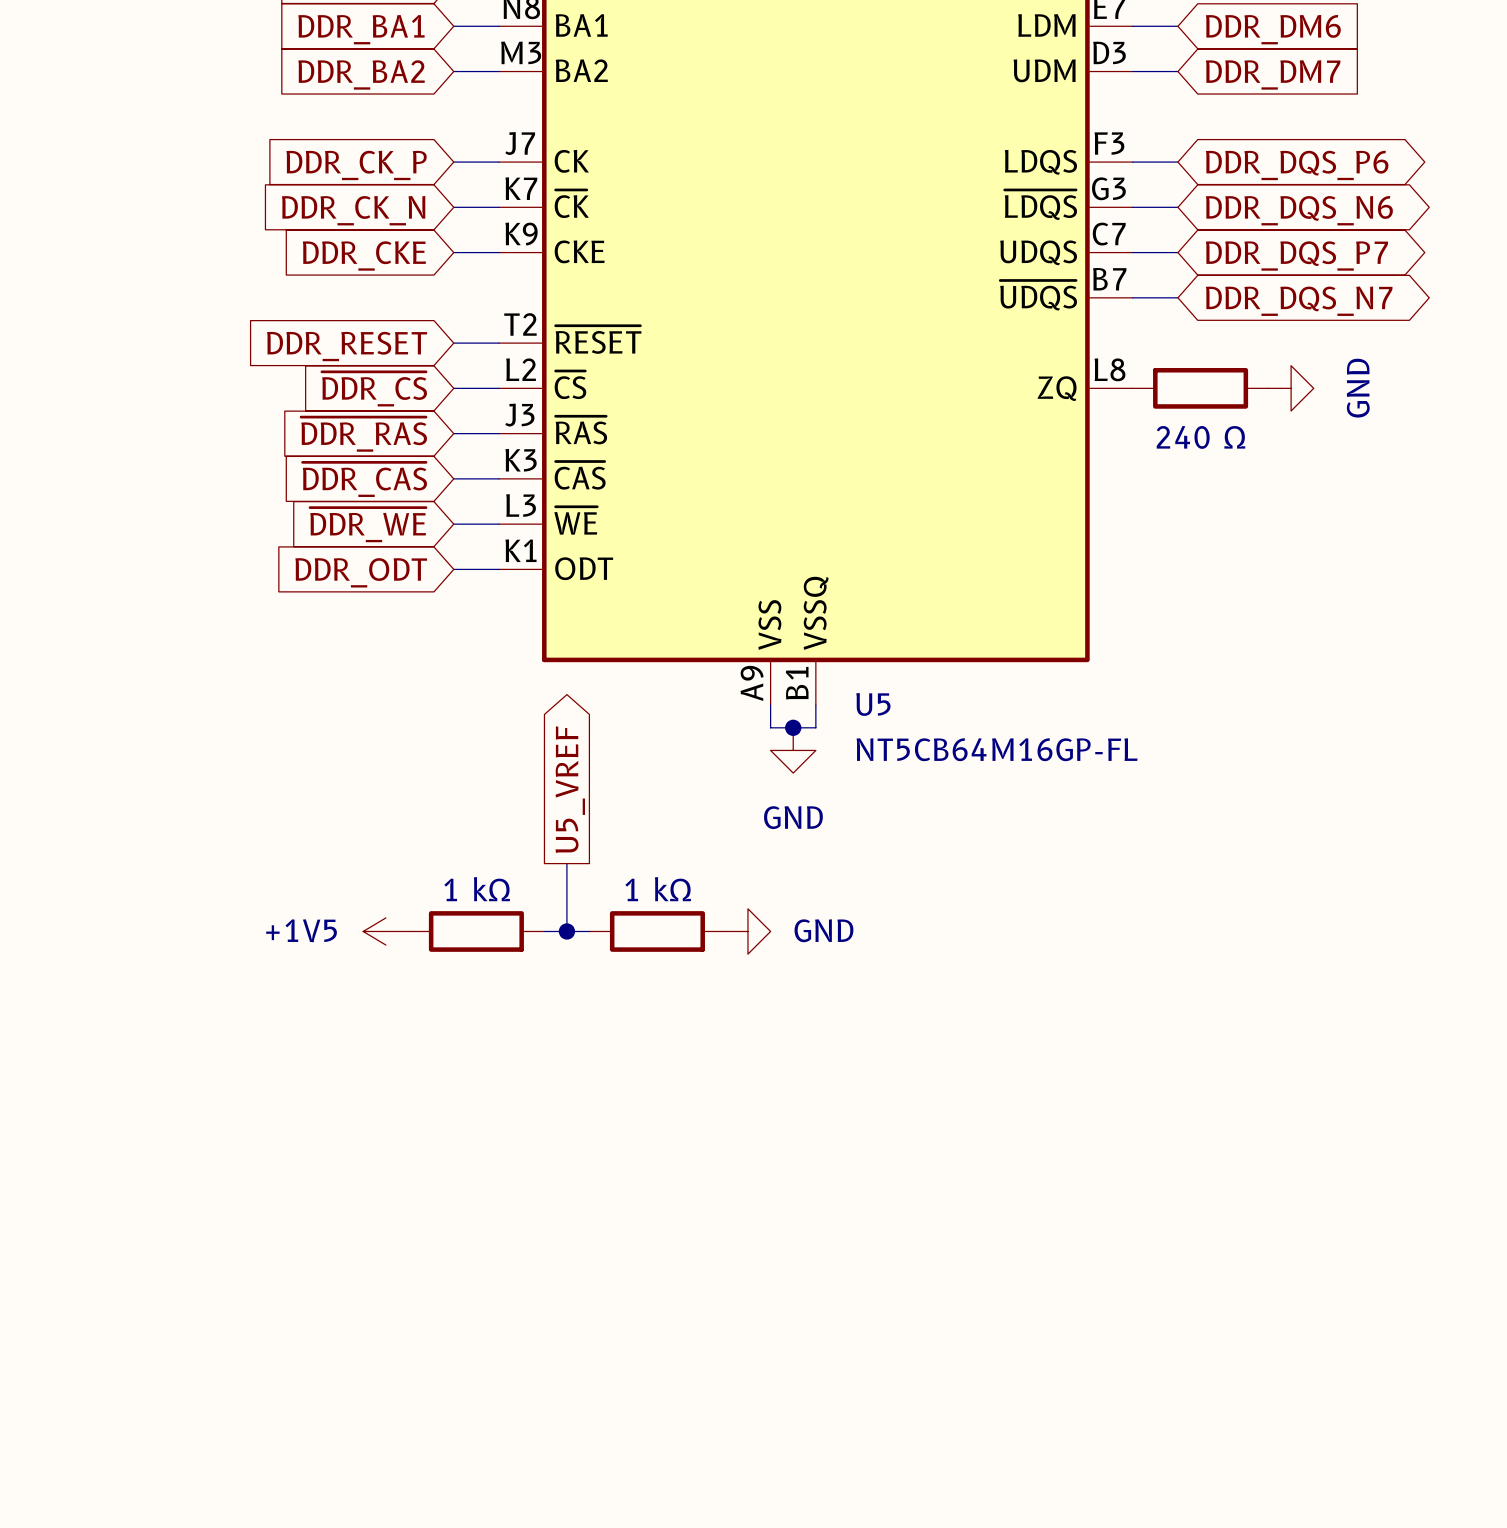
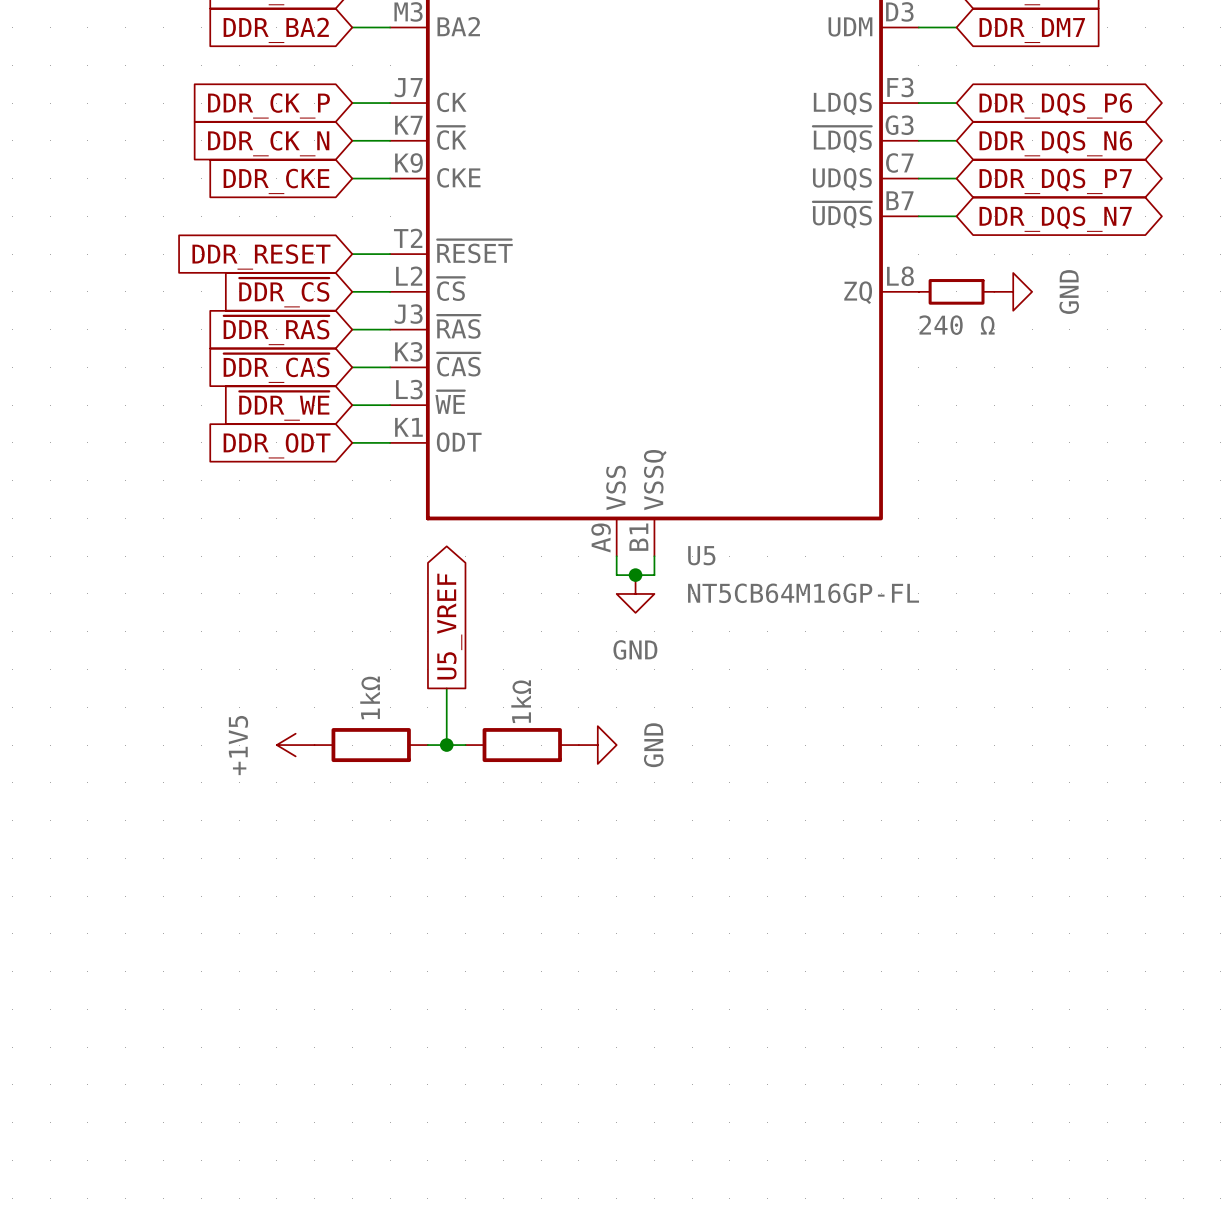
part: none -> 240 Ω (956, 291)
part: 240 Ω (1200, 388) -> none
power symbol position: GND (1291, 388) -> GND (1013, 291)
part value: 1 kΩ (477, 889) -> 1kΩ (370, 697)
part value: 1 kΩ (658, 889) -> 1kΩ (521, 701)
power symbol text rotation: 0° (301, 930) -> 90° counterclockwise (238, 745)
power symbol text rotation: 0° (823, 930) -> 90° counterclockwise (653, 745)

